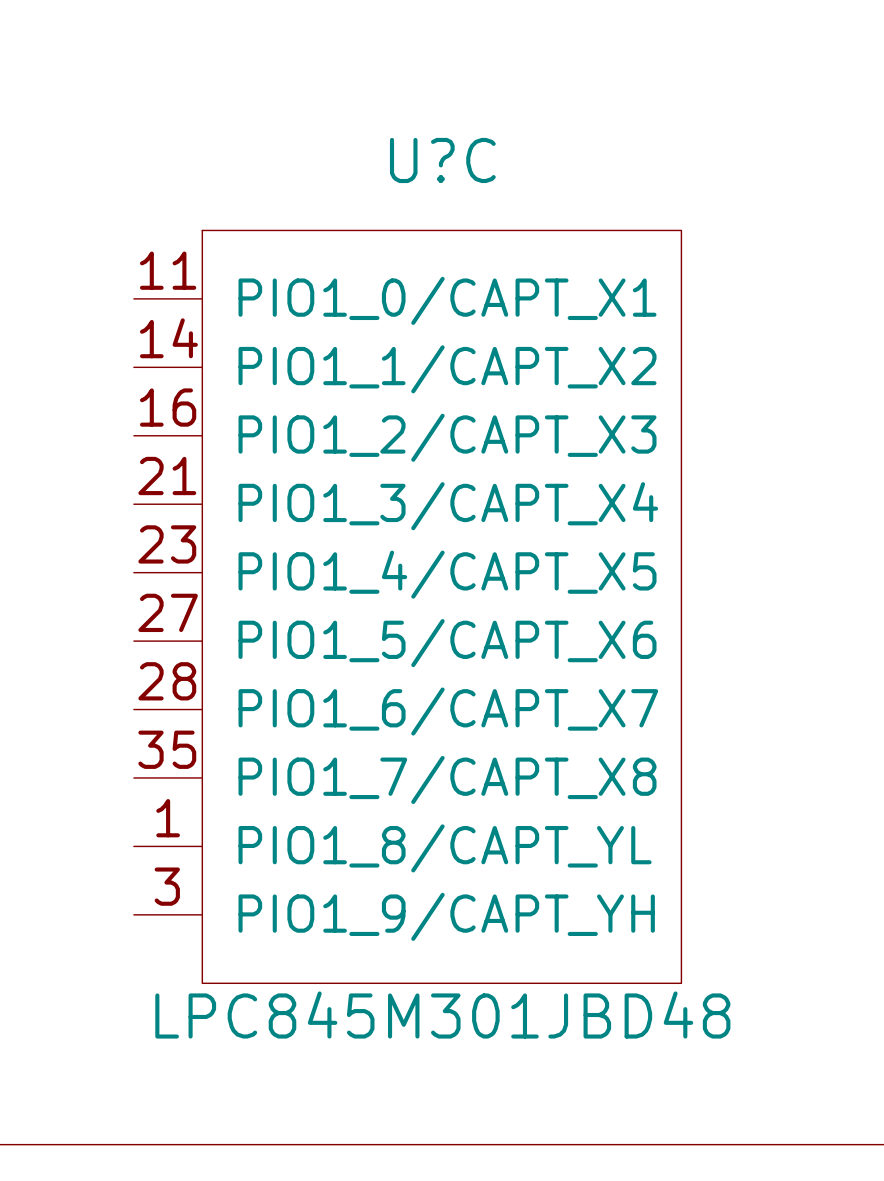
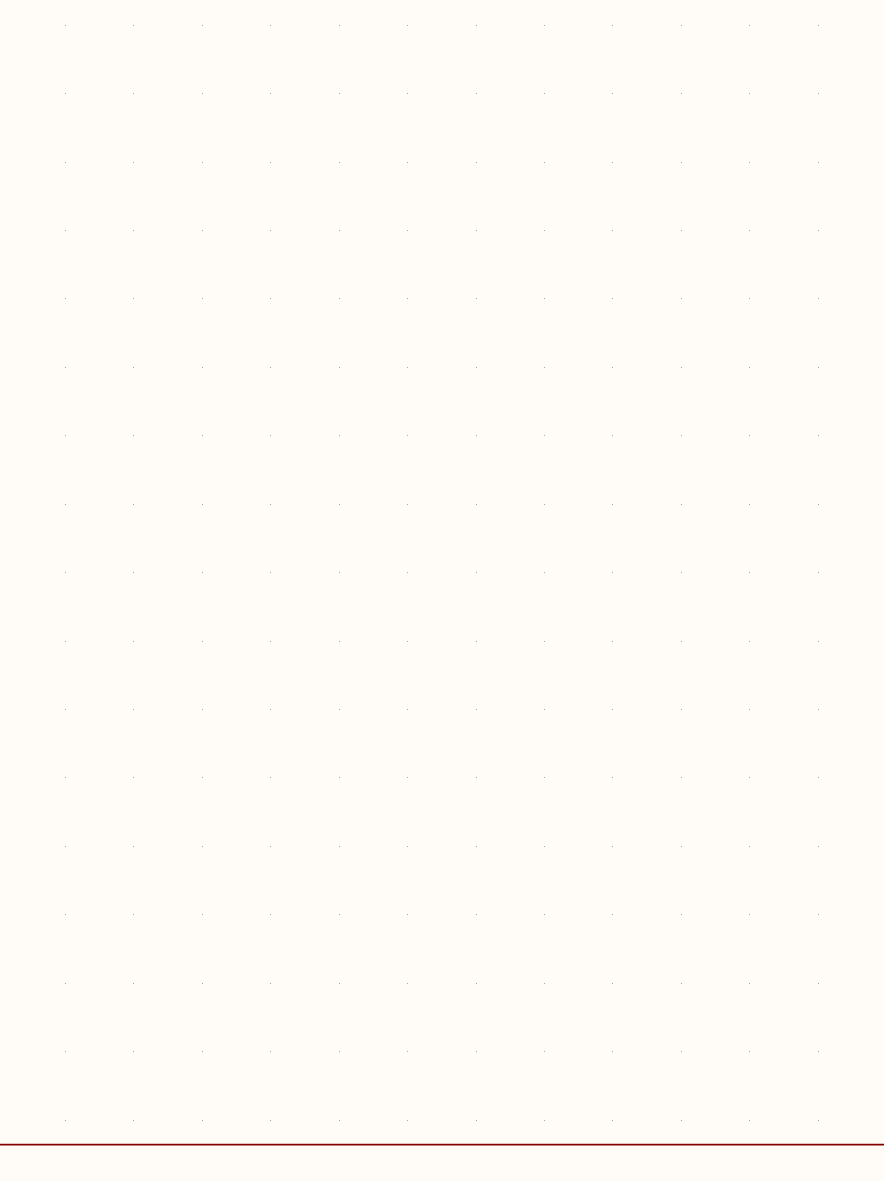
U?C: LPC845M301JBD48 (407, 606) -> none

